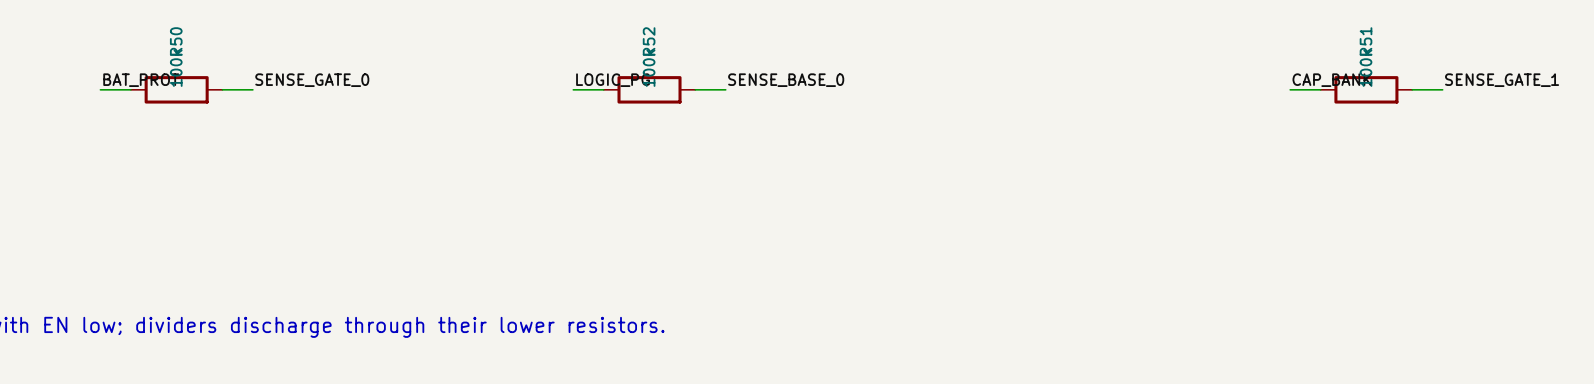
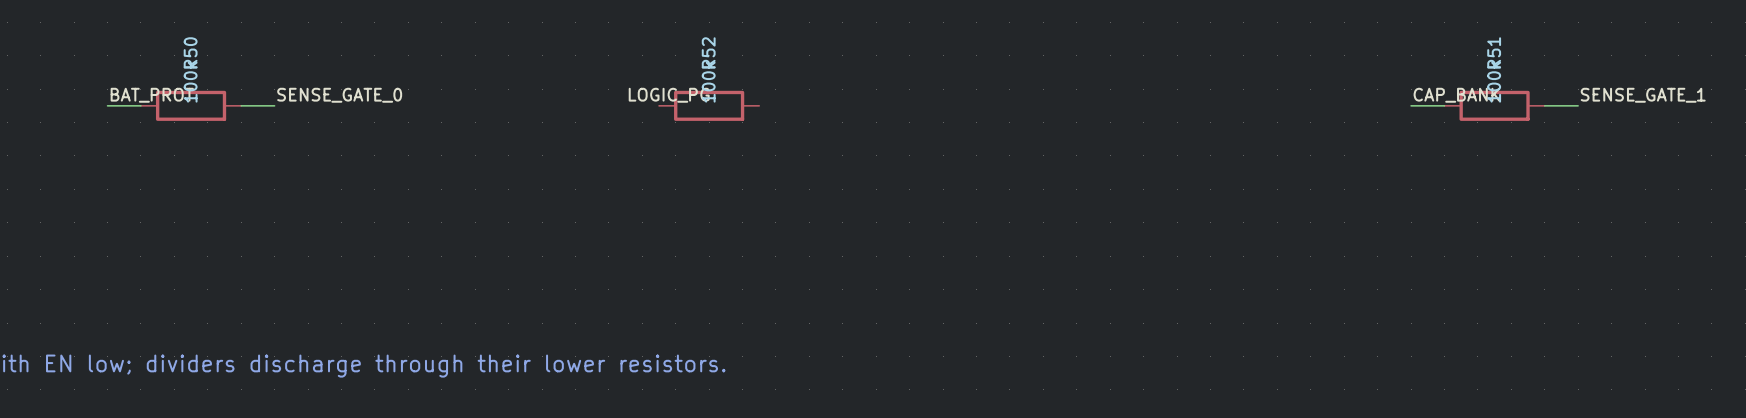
label: SENSE_BASE_0 (786, 80) -> none
wire: (573, 89) (603, 89) -> none
wire: (695, 89) (725, 89) -> none

